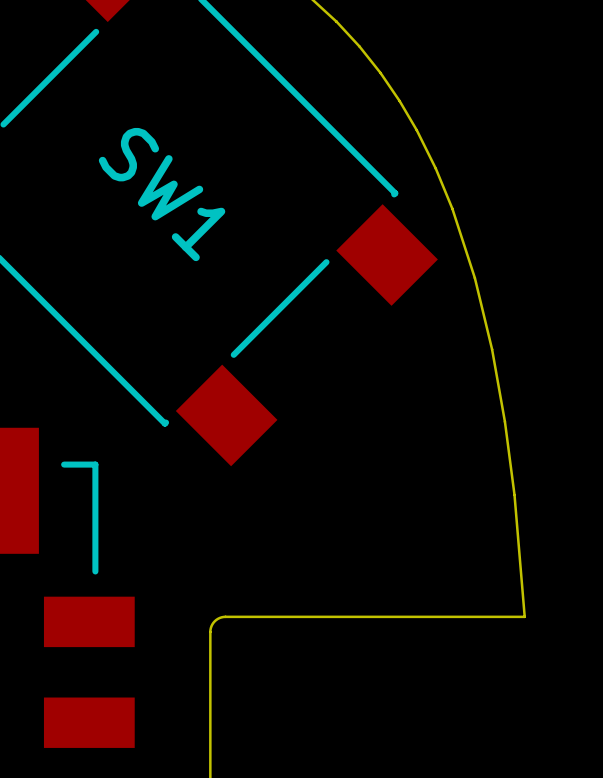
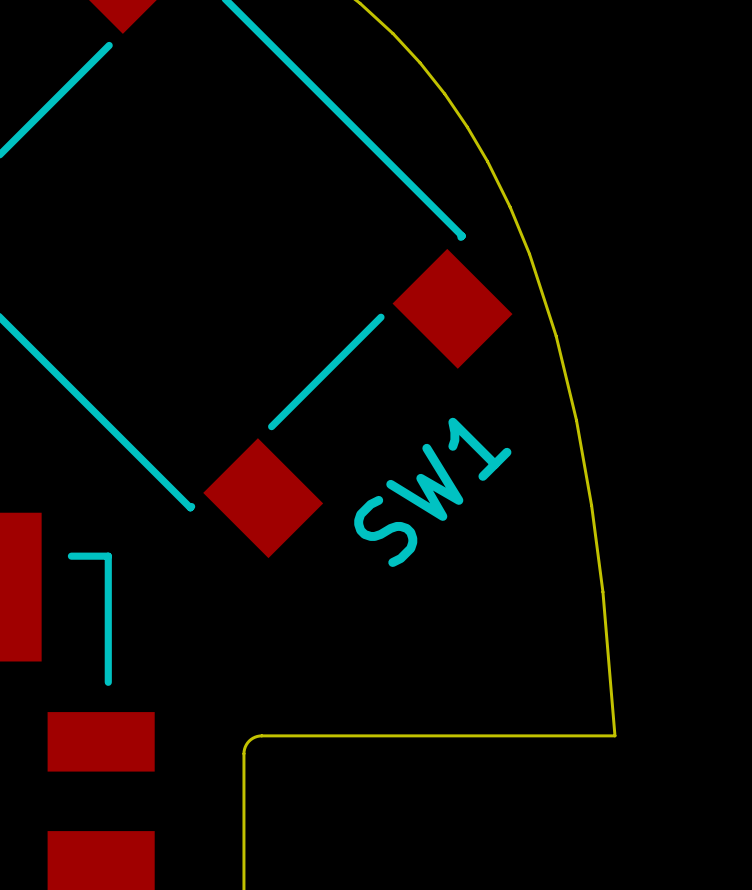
SW1 name rotation: 0° (162, 194) -> 90° counterclockwise (432, 492)
SW1 name position: SW1 (162, 194) -> SW1 (432, 492)

